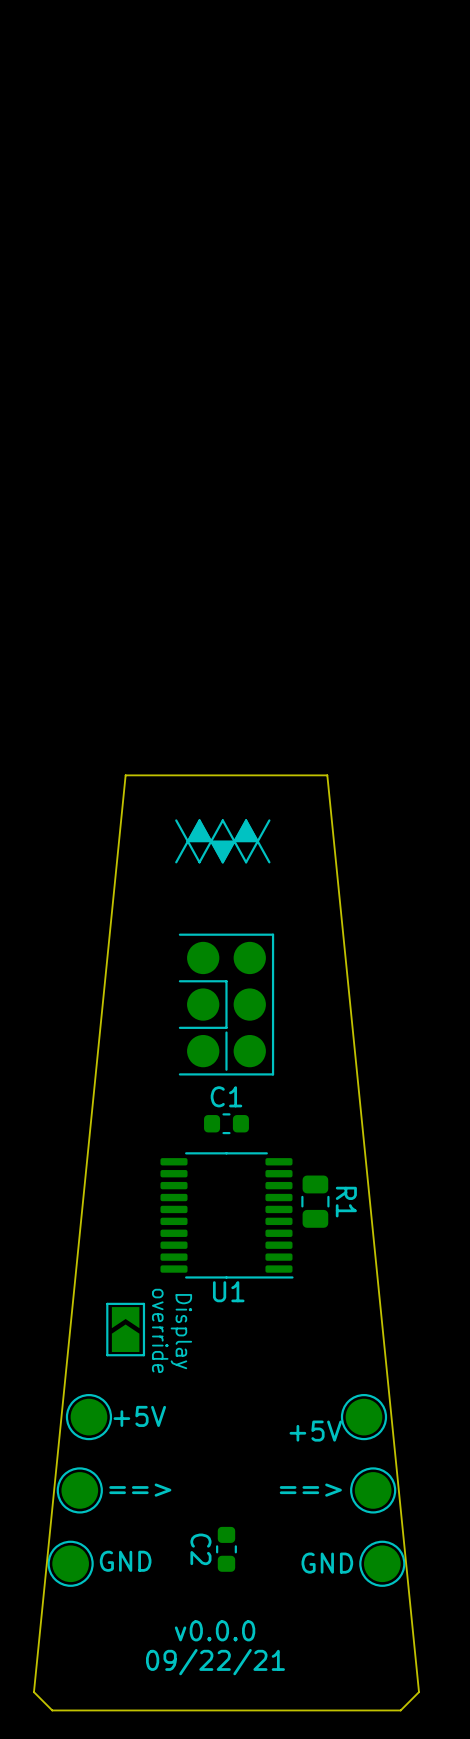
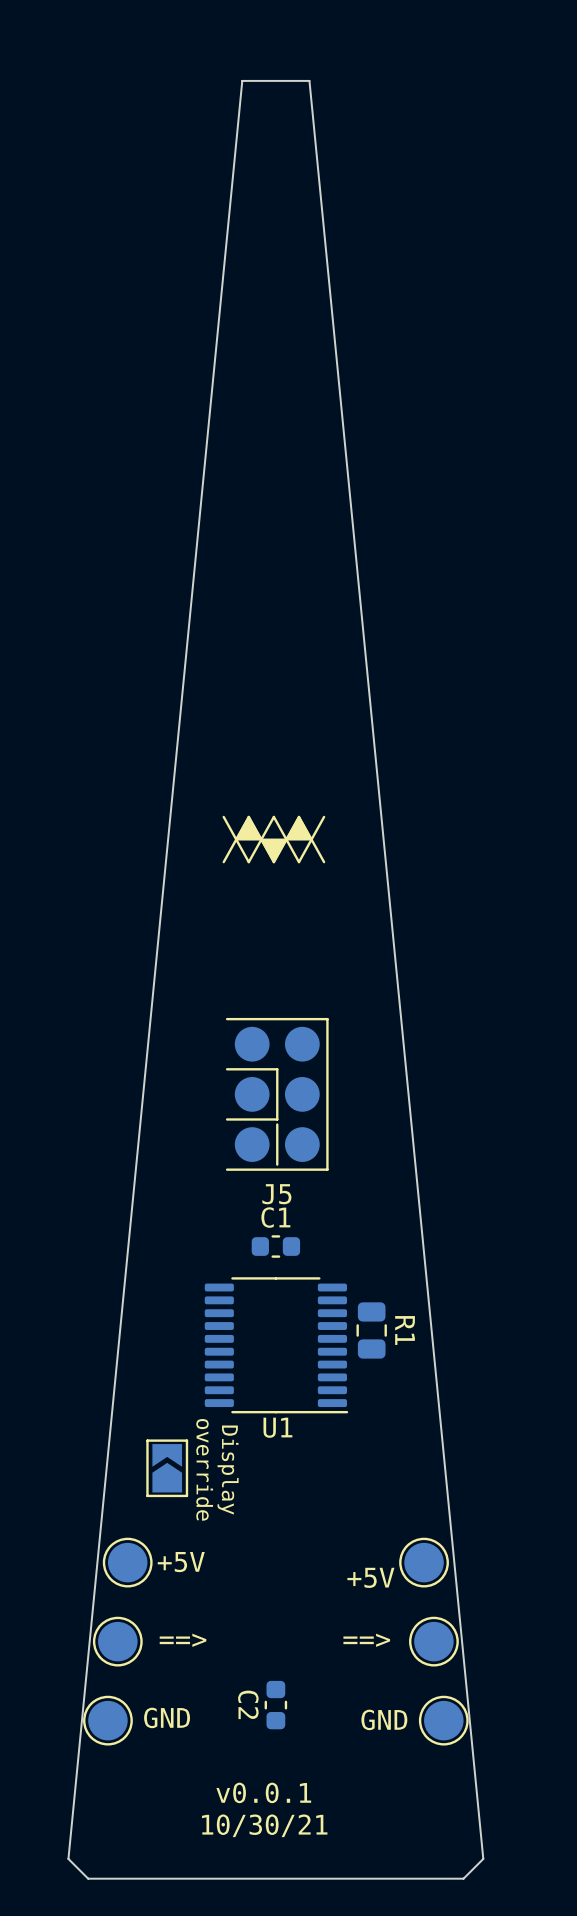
drawing position: (222, 841) -> (273, 839)
J5: none -> (277, 1094)
part: (226, 1004) -> none
text: v0.0.0 (215, 1630) -> v0.0.1 (263, 1792)
text: 09/22/21 (215, 1662) -> 10/30/21 (264, 1825)
board edge: (419, 1692) (327, 775) (125, 775) (33, 1692) -> (483, 1858) (309, 80) (242, 80) (68, 1858)

